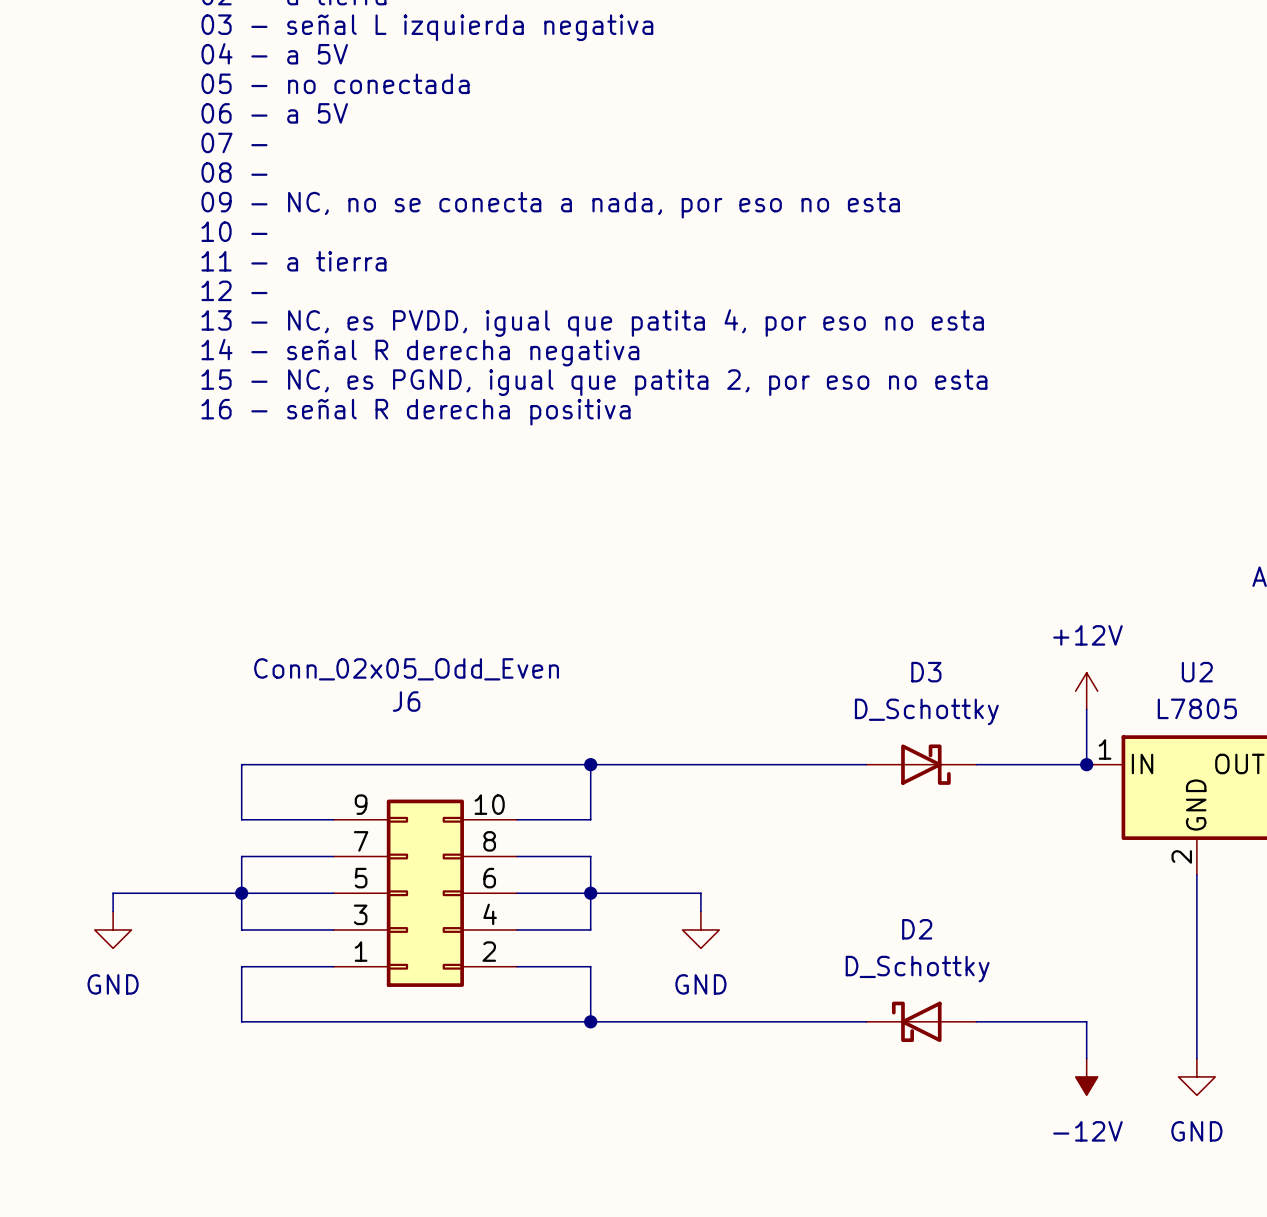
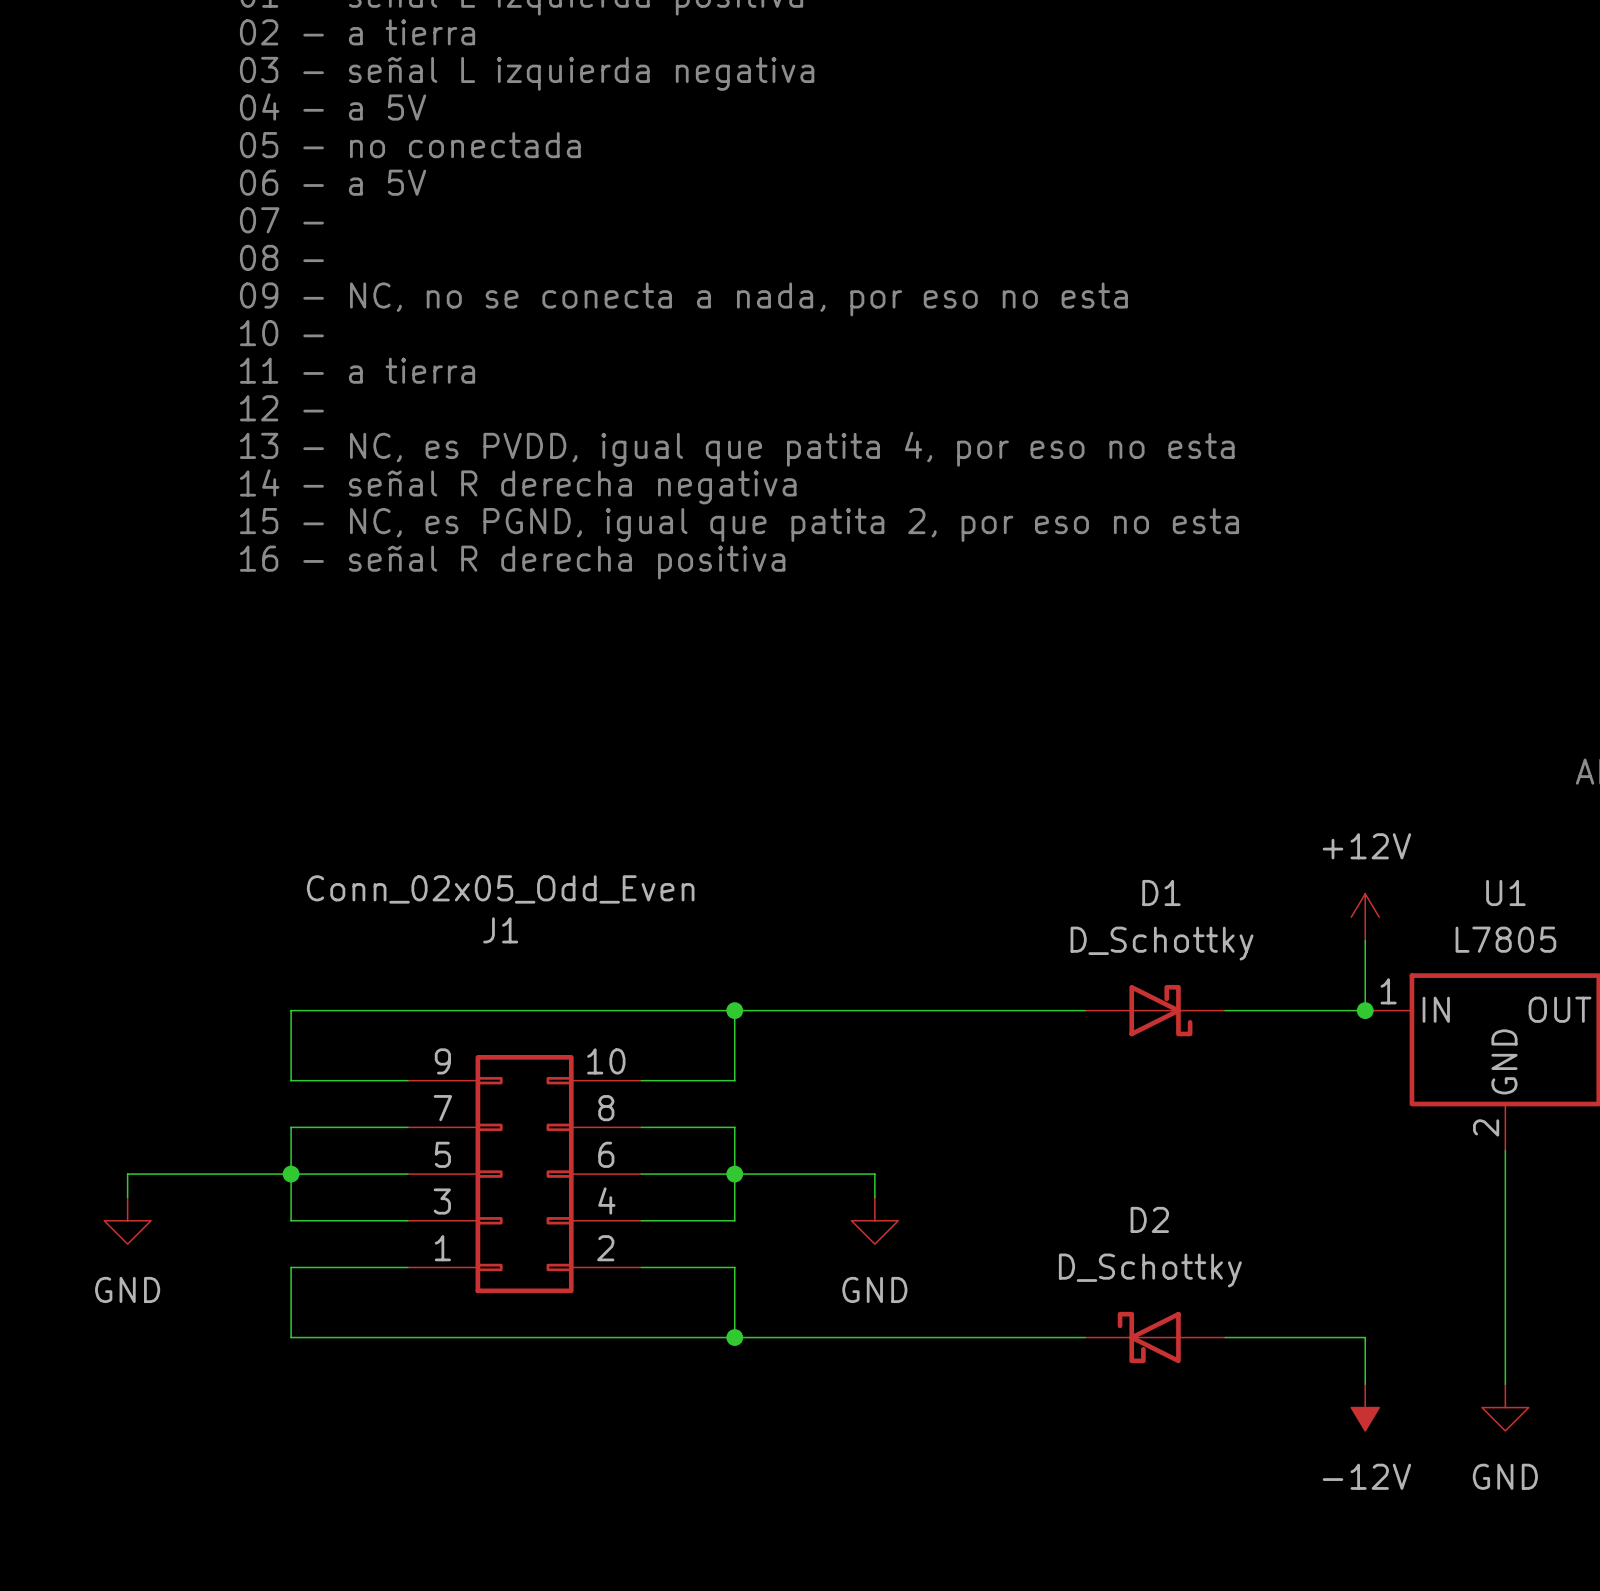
D3 name: D3 (926, 672) -> D1 (1161, 892)
U2 name: U2 (1197, 672) -> U1 (1505, 892)
J6 name: J6 (406, 701) -> J1 (500, 930)

